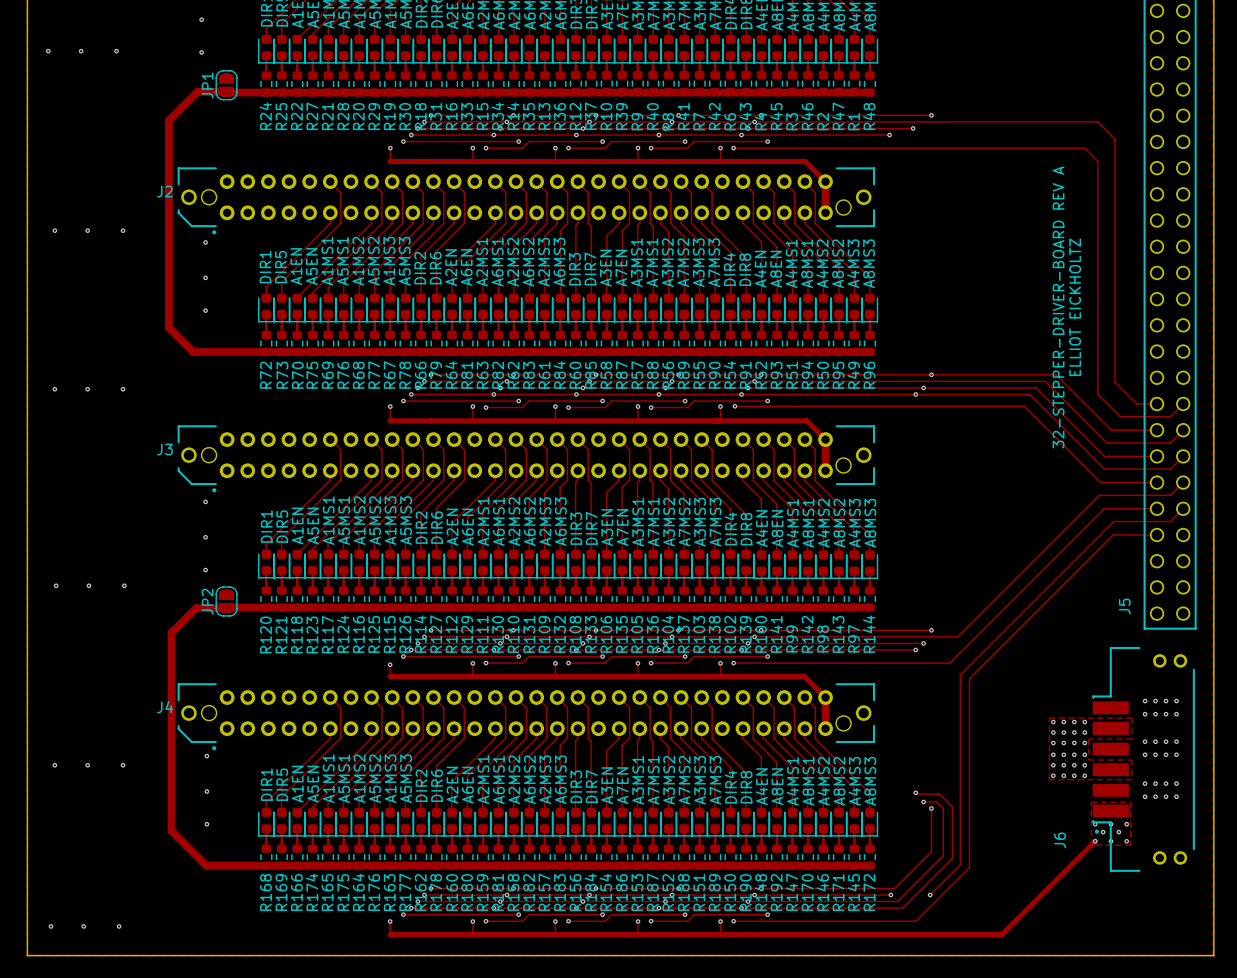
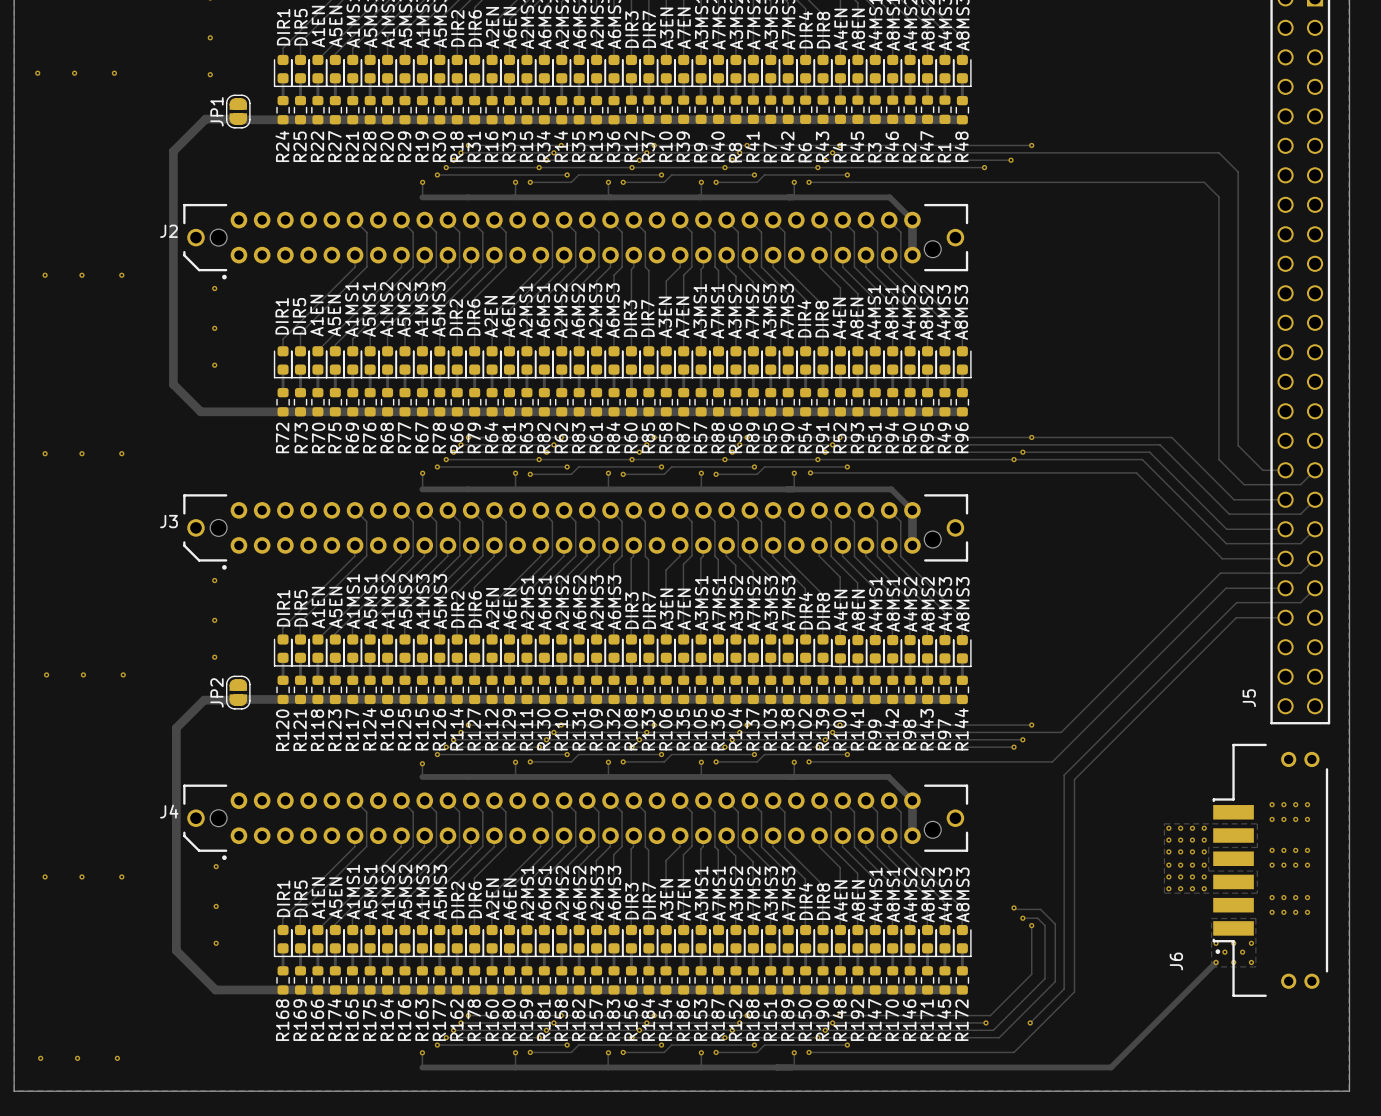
text: 32-STEPPER-DRIVER-BOARD REV A (1058, 307) -> none
text: ELLIOT EICKHOLTZ (1075, 307) -> none

